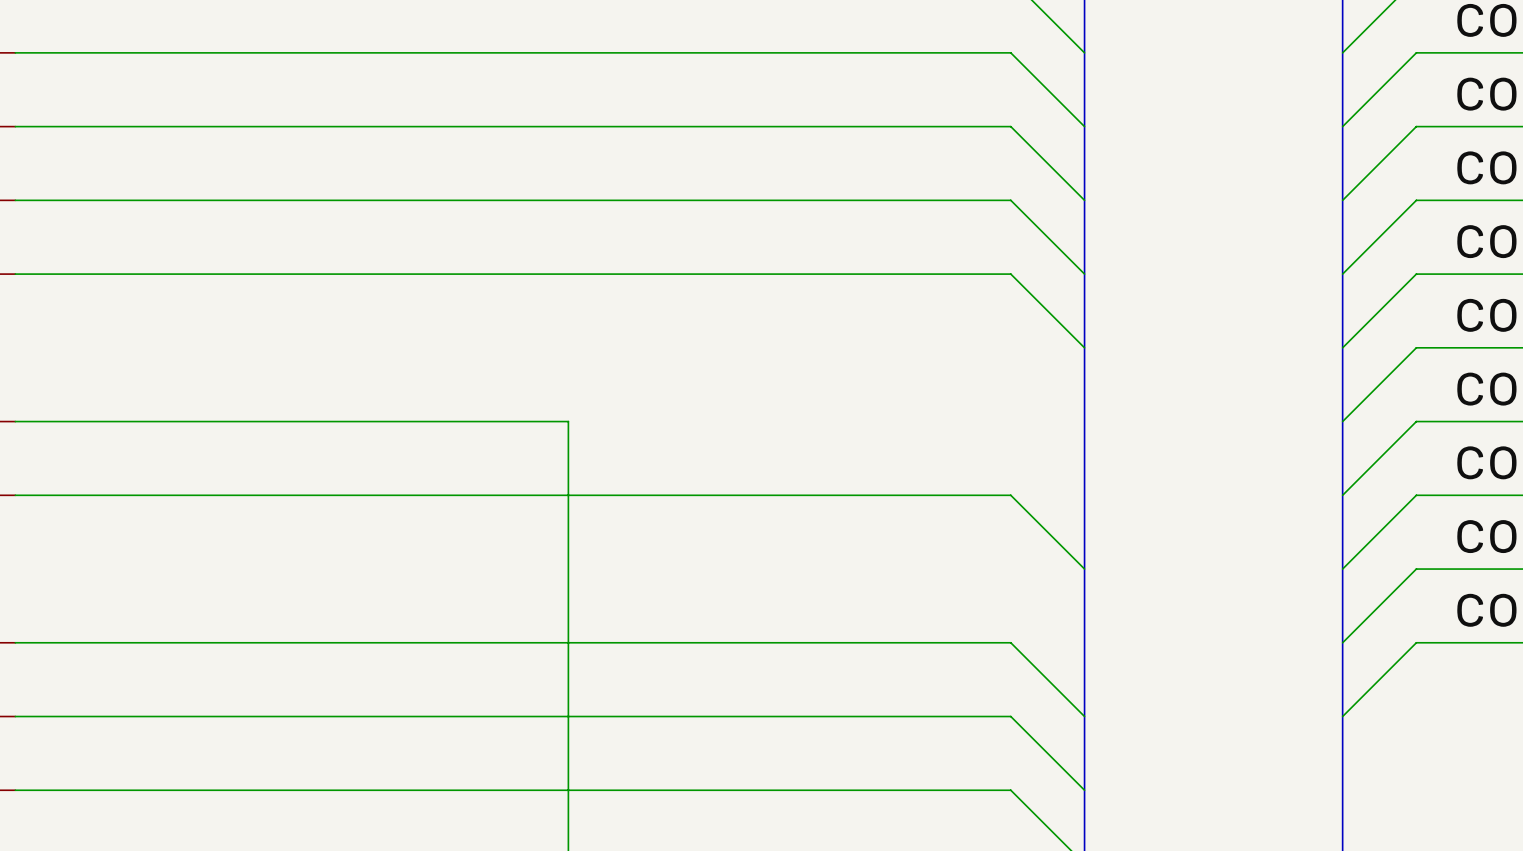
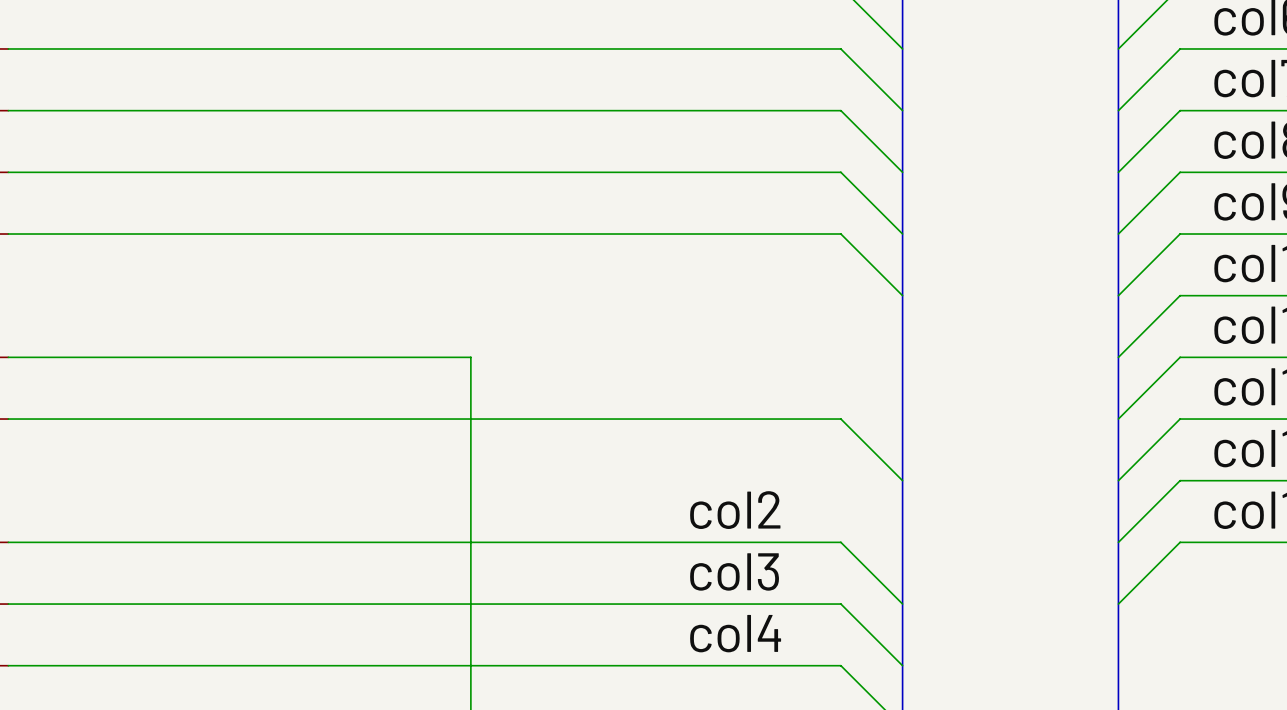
label: none -> col2 (735, 510)
label: none -> col3 (734, 571)
label: none -> col4 (735, 633)

